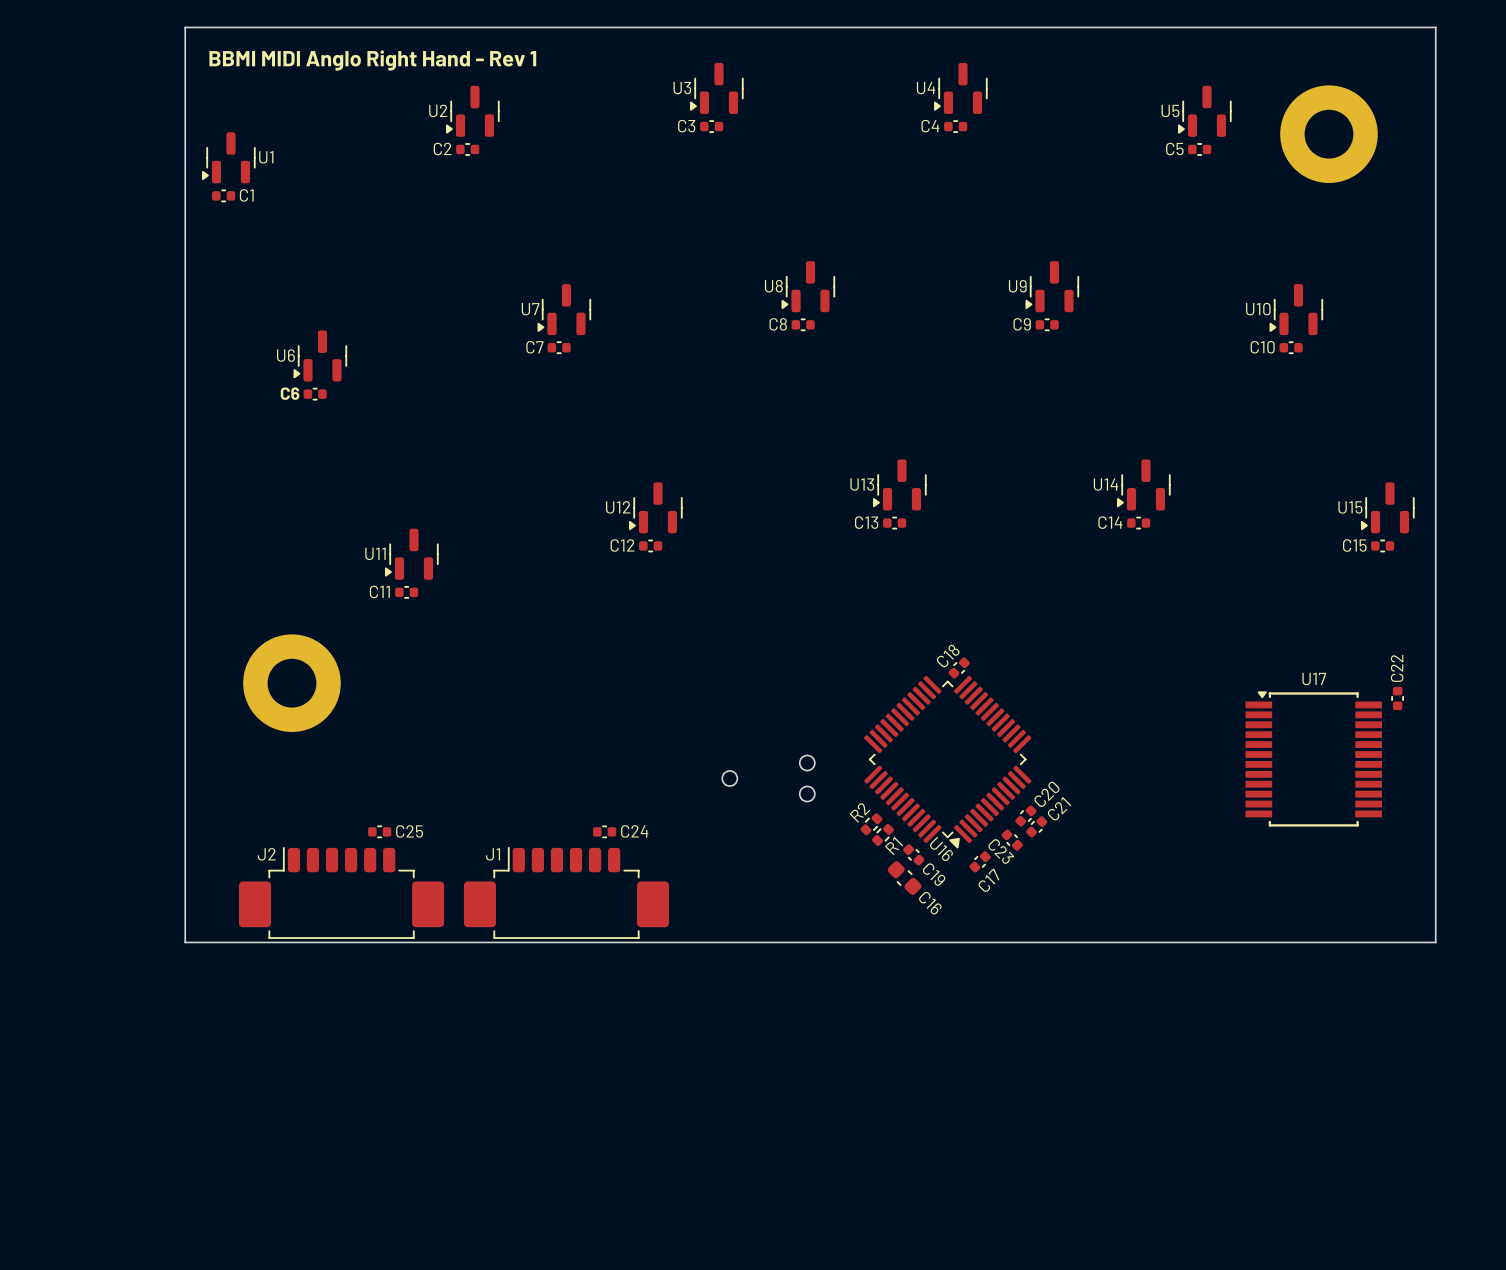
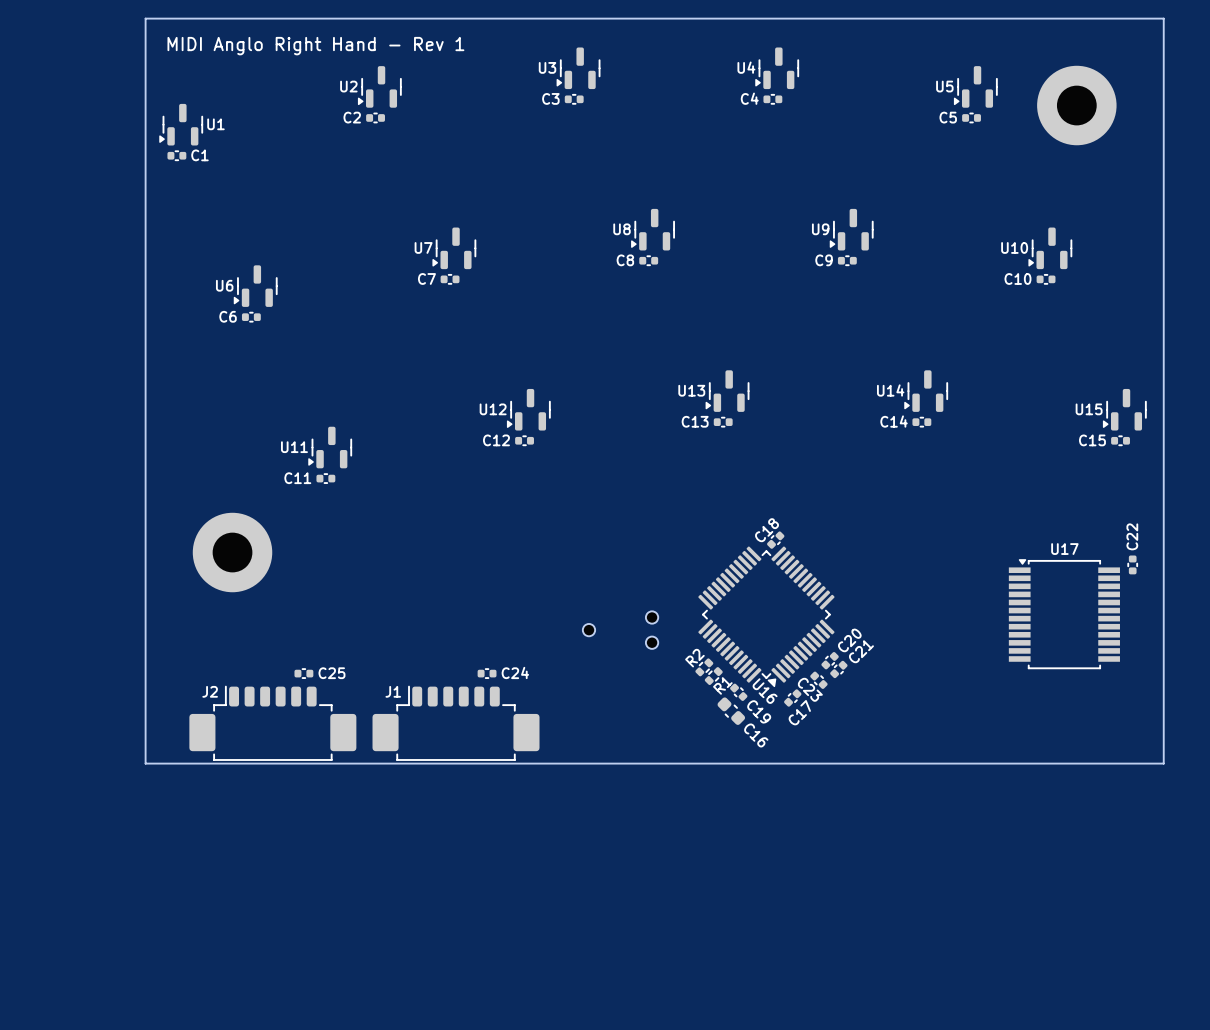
text: BBMI MIDI Anglo Right Hand - Rev 1 (372, 60) -> MIDI Anglo Right Hand - Rev 1 (315, 46)

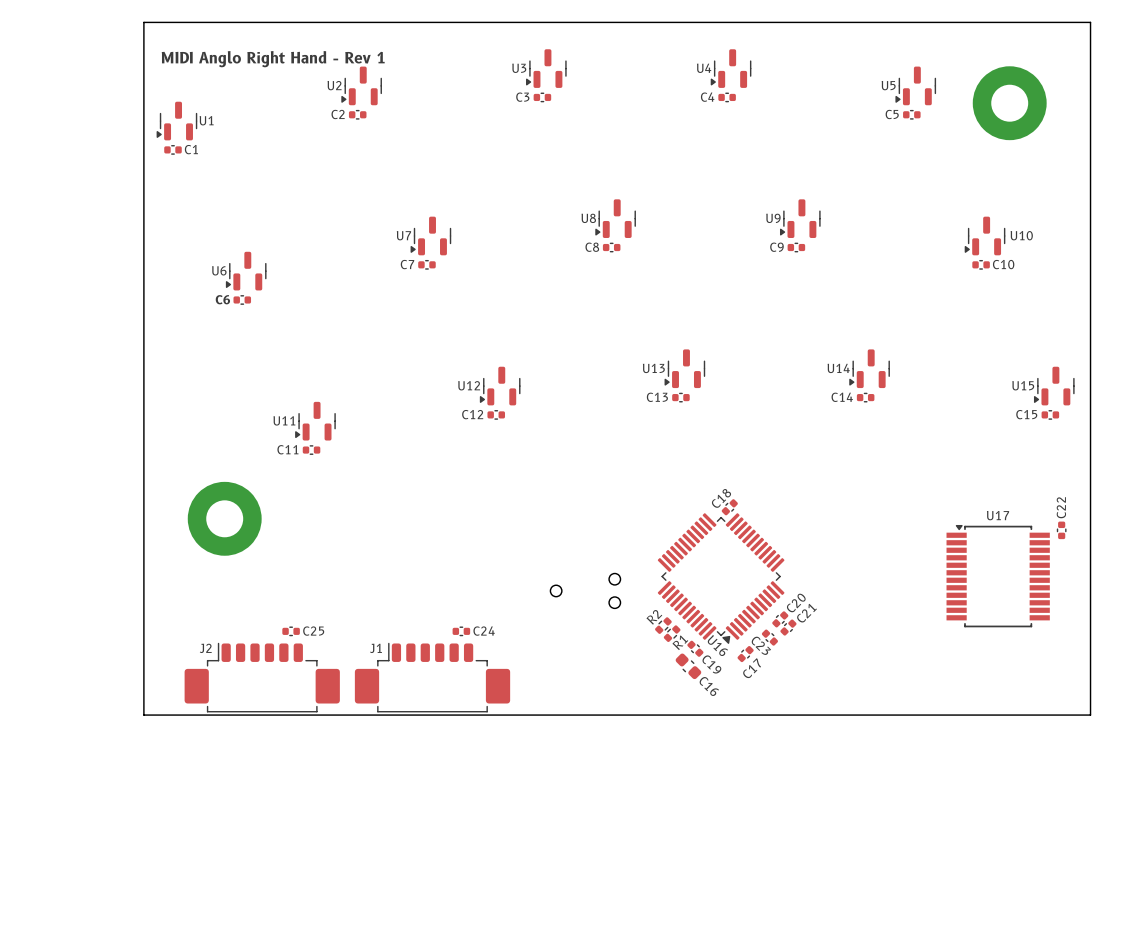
text position: MIDI Anglo Right Hand - Rev 1 (315, 46) -> MIDI Anglo Right Hand - Rev 1 (273, 59)
U10 name position: U10 (1014, 247) -> U10 (1021, 235)
C10 name position: C10 (1017, 279) -> C10 (1003, 264)

